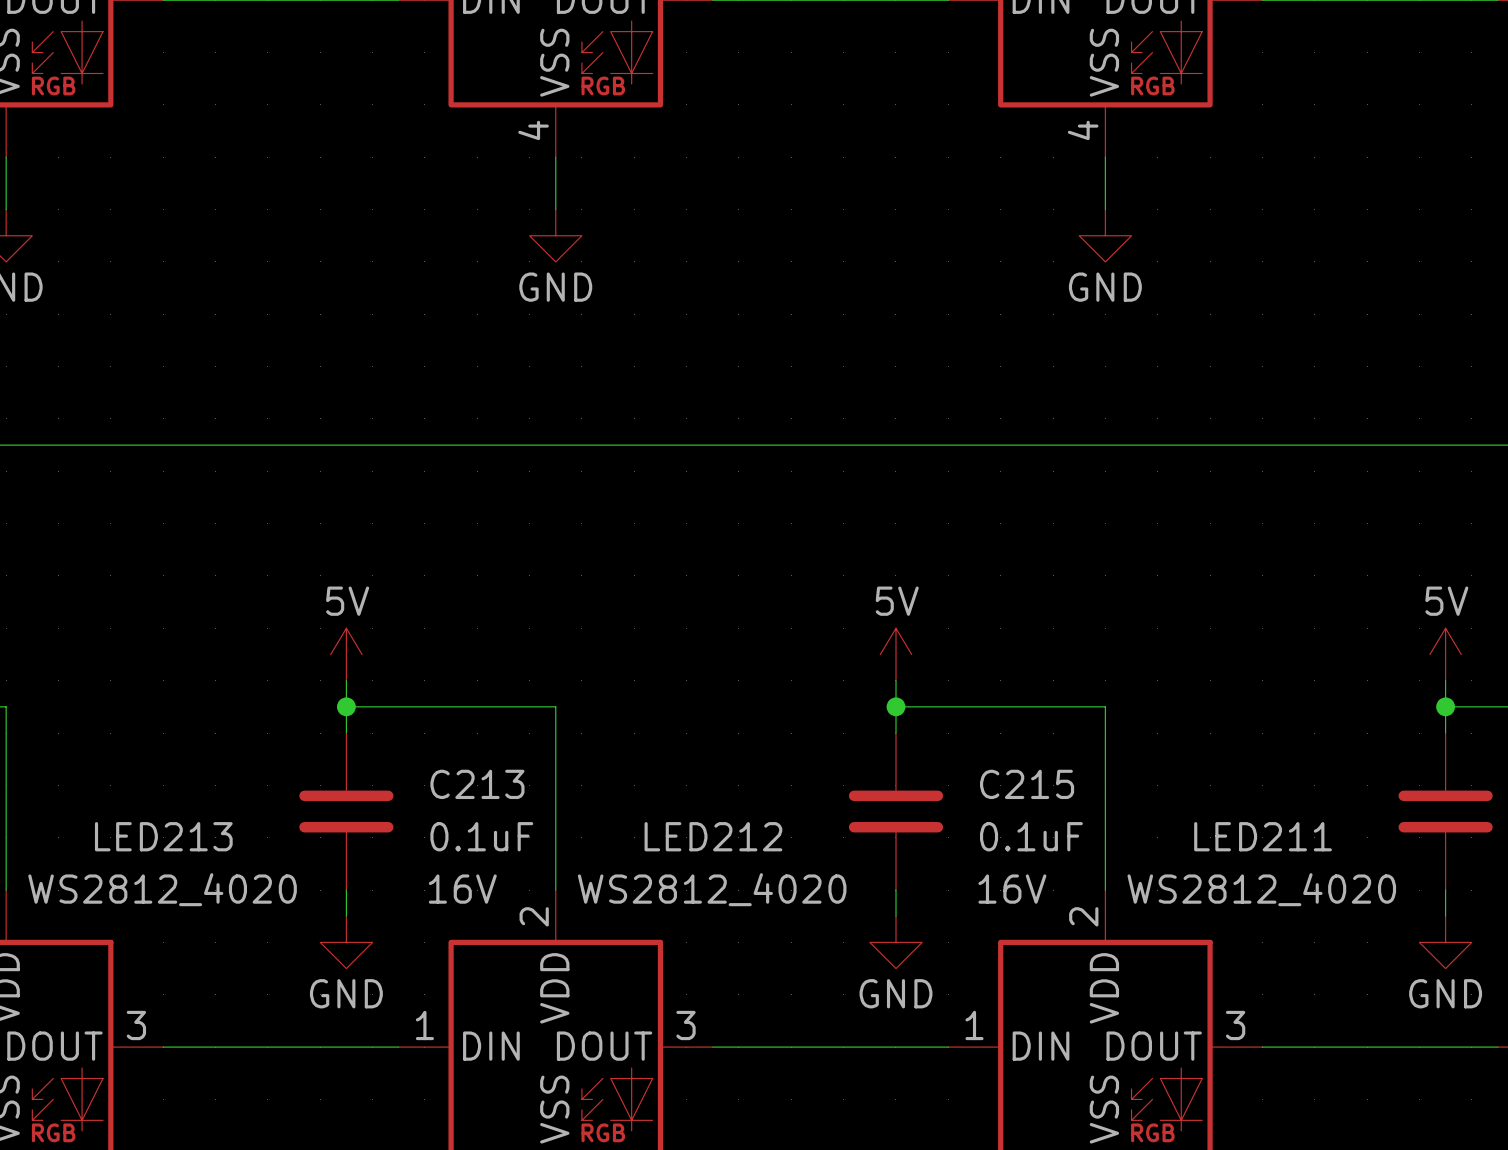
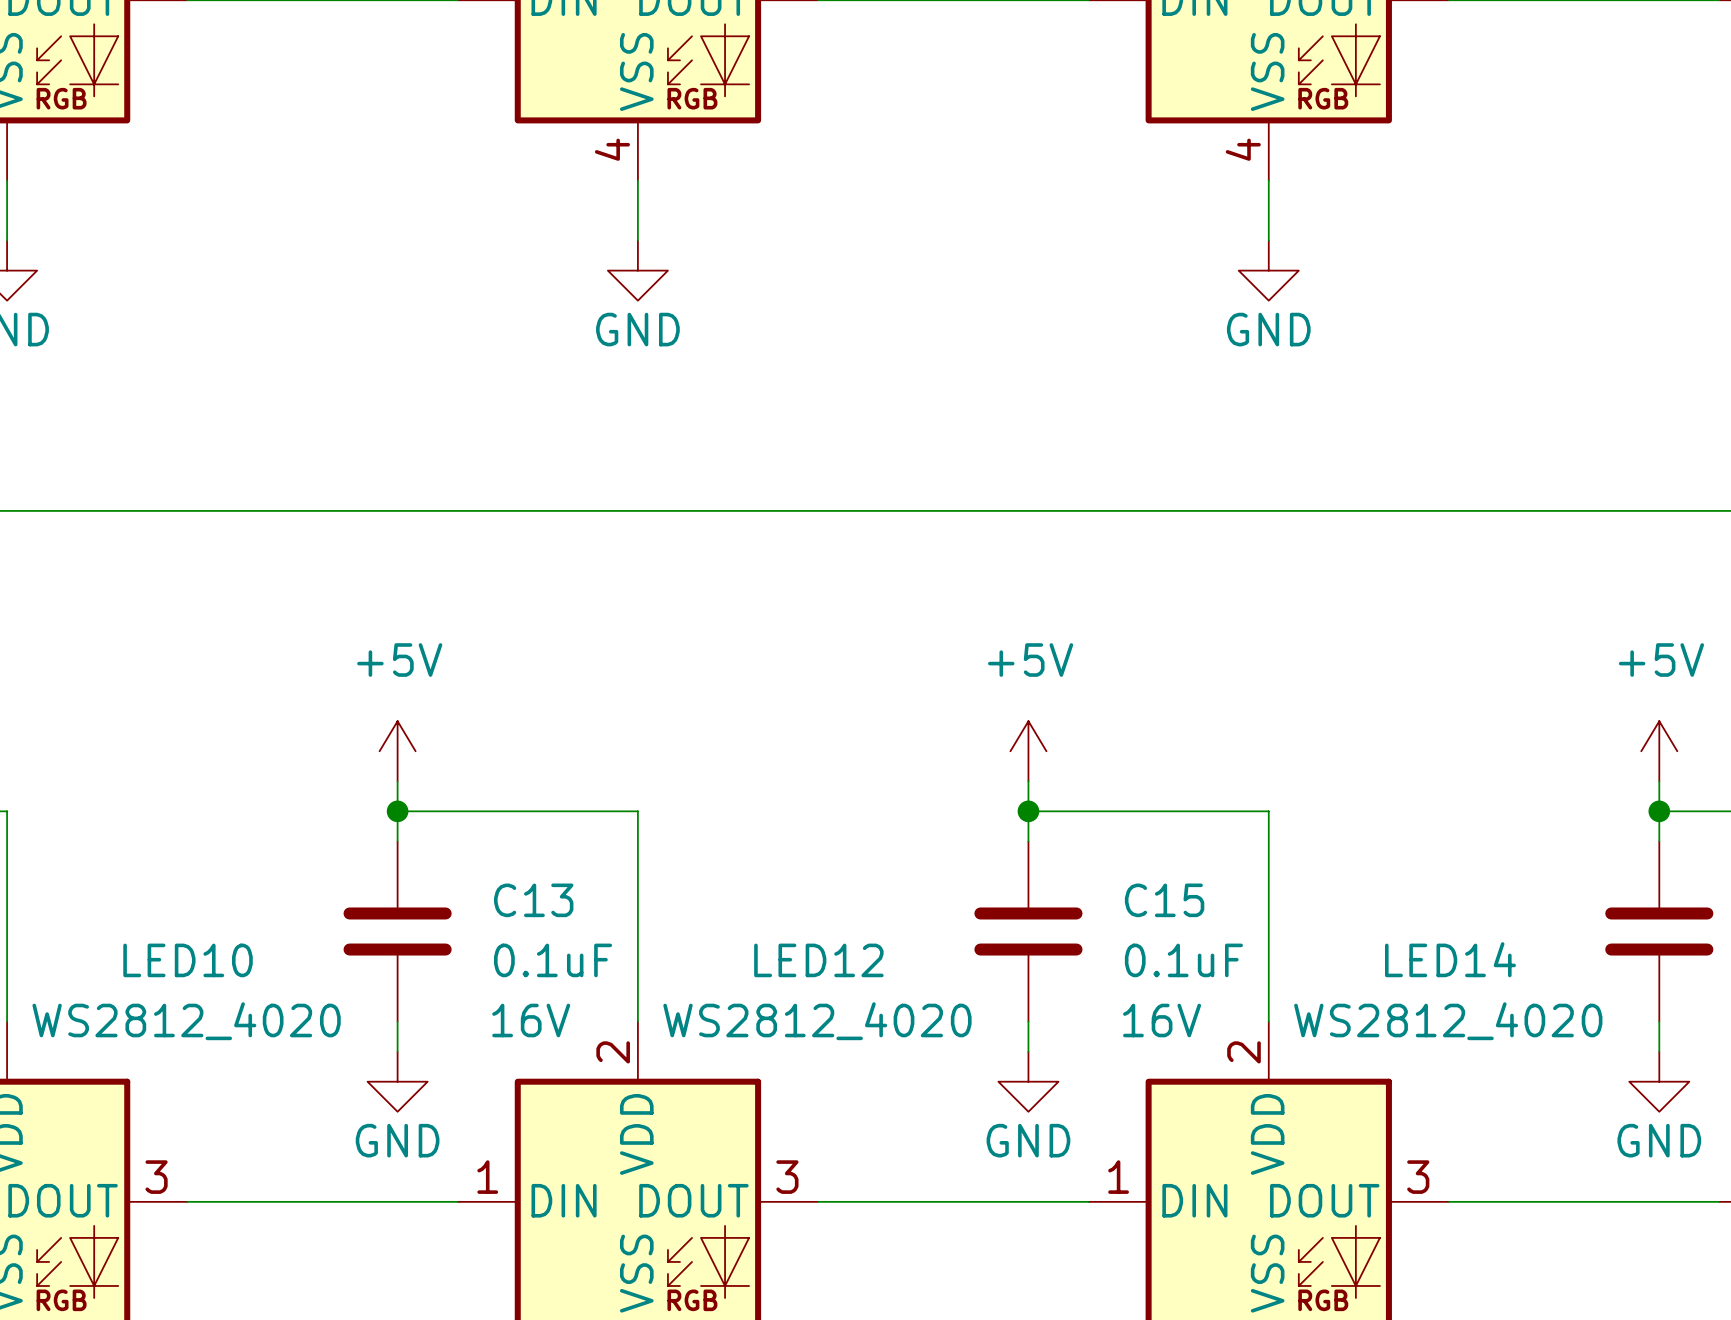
power symbol: 5V (346, 654) -> +5V (397, 751)
power symbol: 5V (895, 654) -> +5V (1028, 751)
power symbol: 5V (1445, 654) -> +5V (1659, 751)
C213 name: C213 (477, 784) -> C13 (533, 900)
C215 name: C215 (1027, 784) -> C15 (1164, 900)
LED213 name: LED213 (163, 836) -> LED10 (188, 960)
LED212 name: LED212 (713, 836) -> LED12 (818, 960)
LED211 name: LED211 (1263, 836) -> LED14 (1450, 959)

